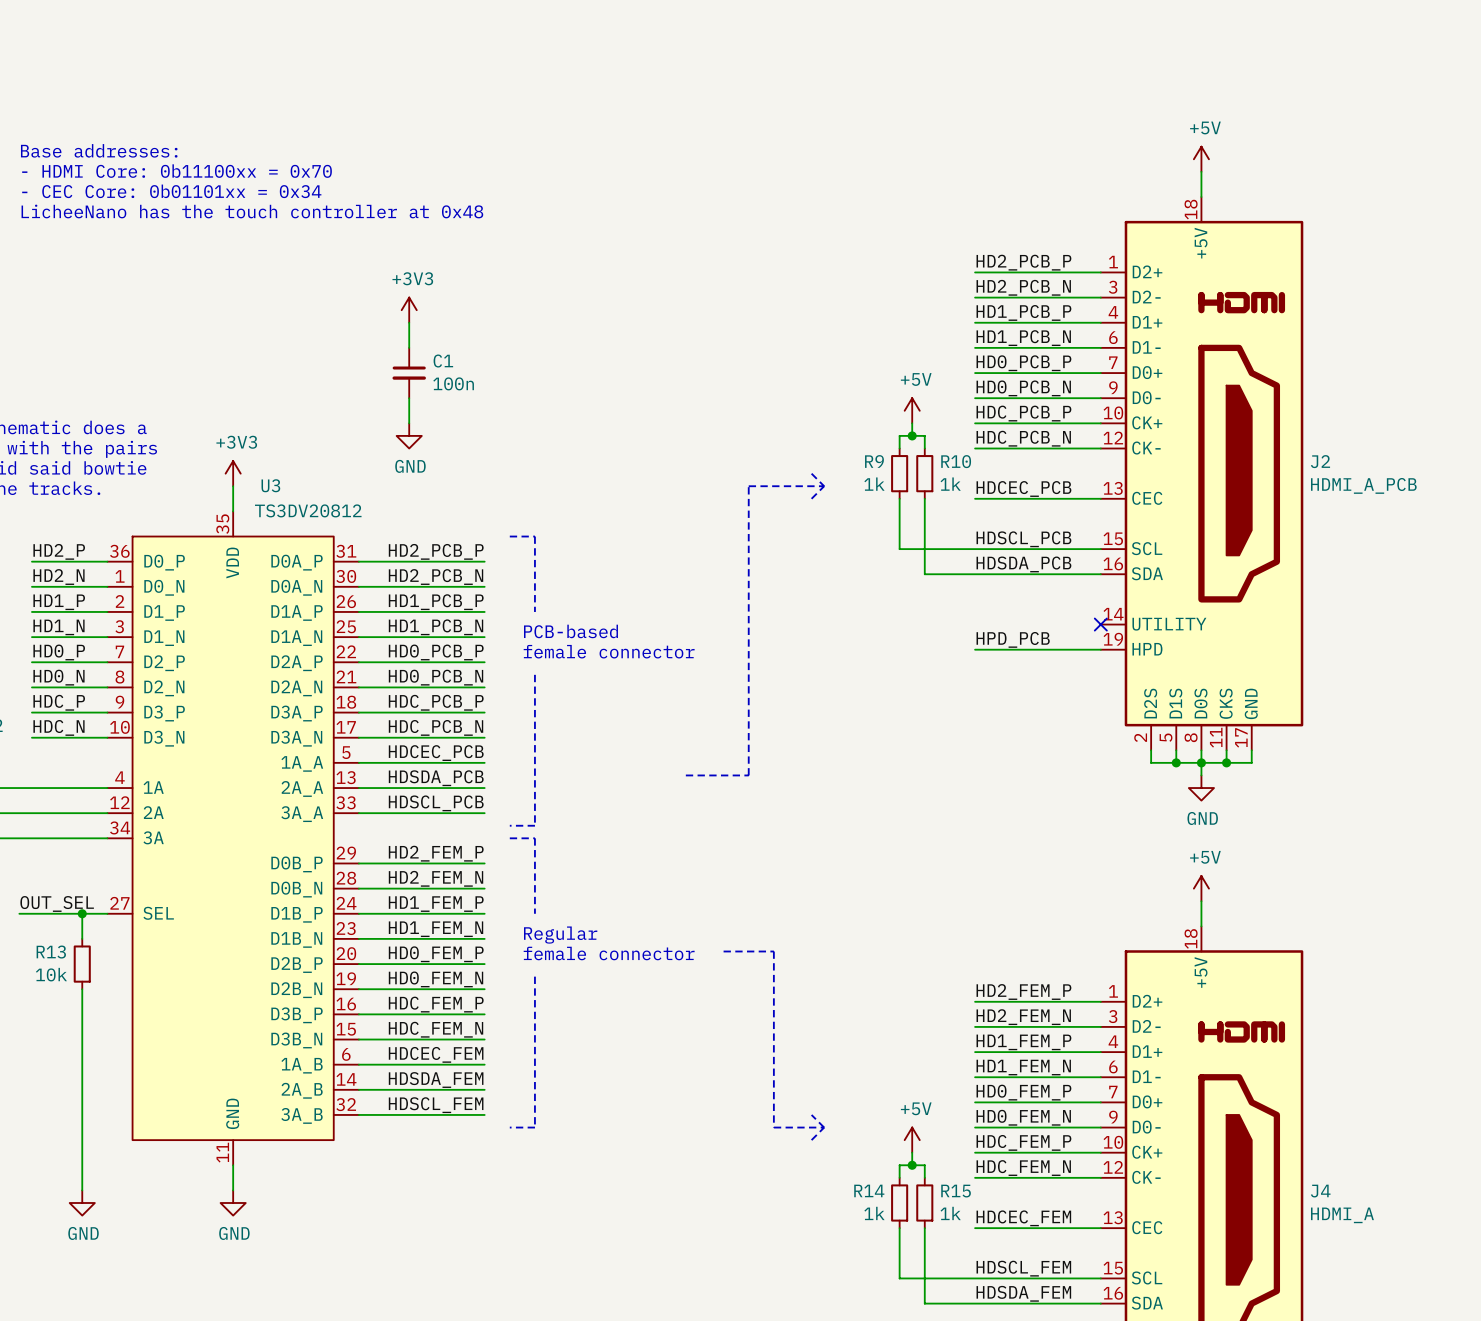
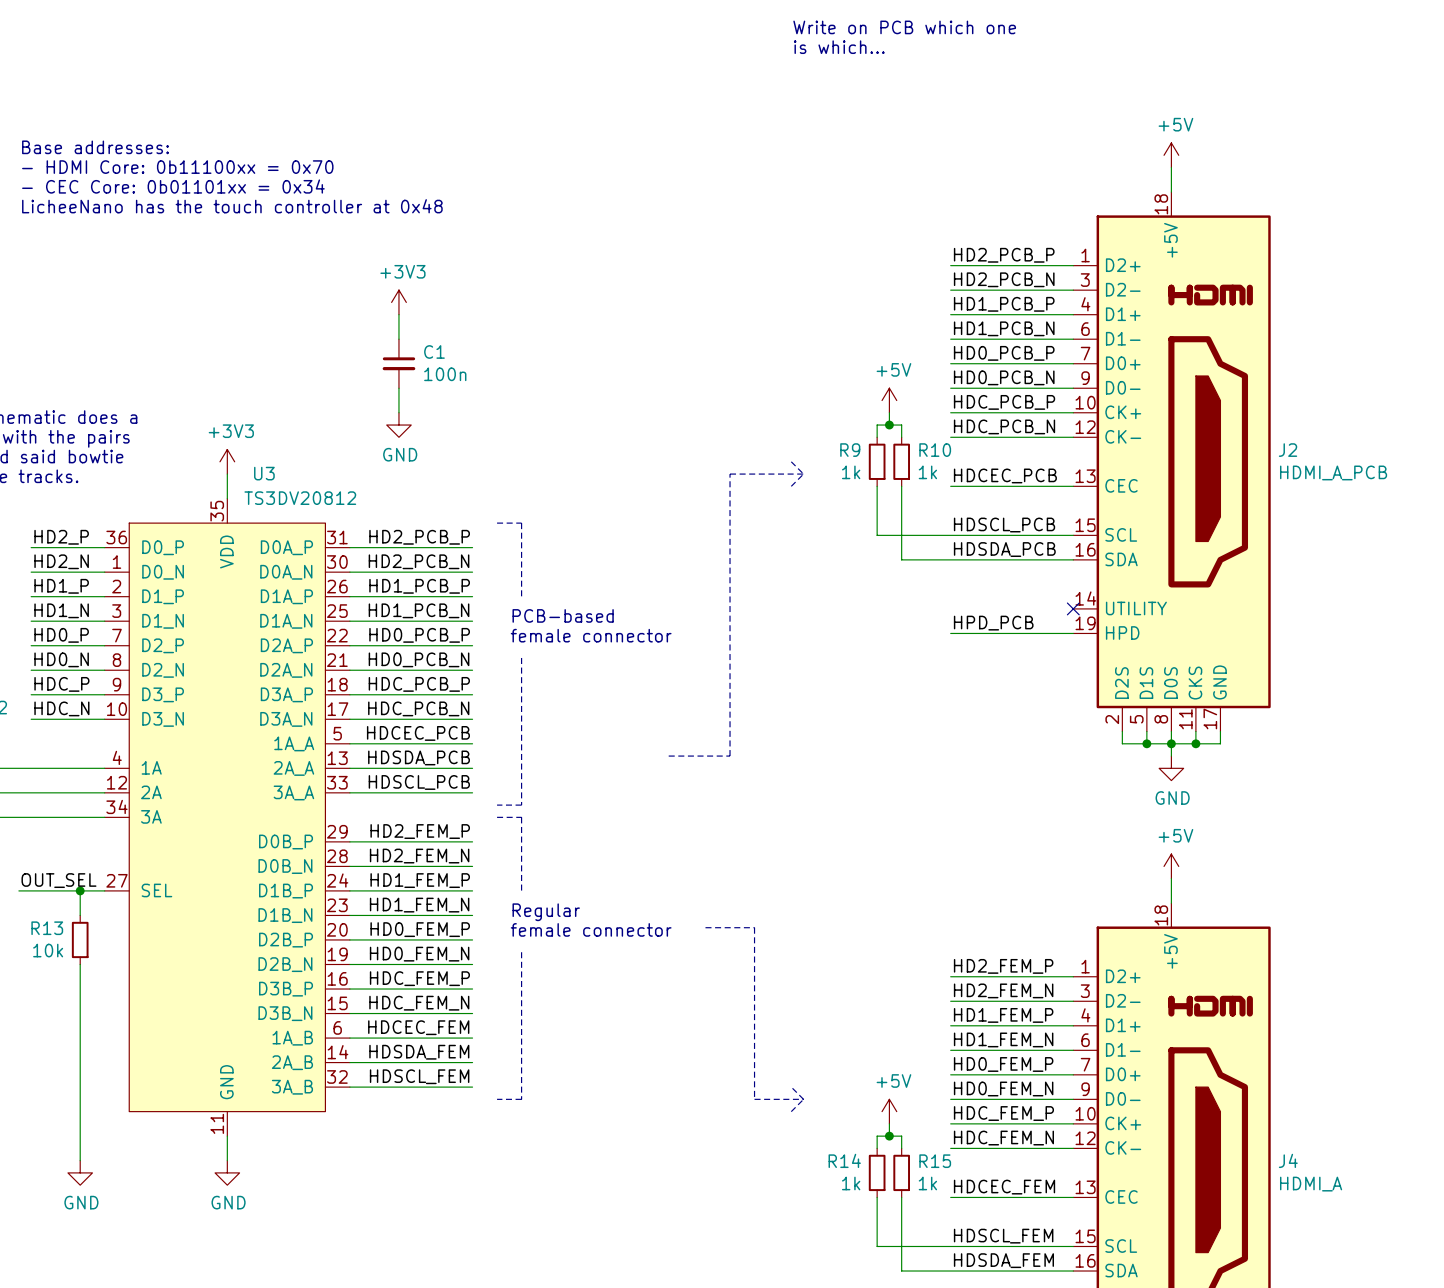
text: none -> Write on PCB which one (904, 27)
text: none -> is which... (839, 47)

